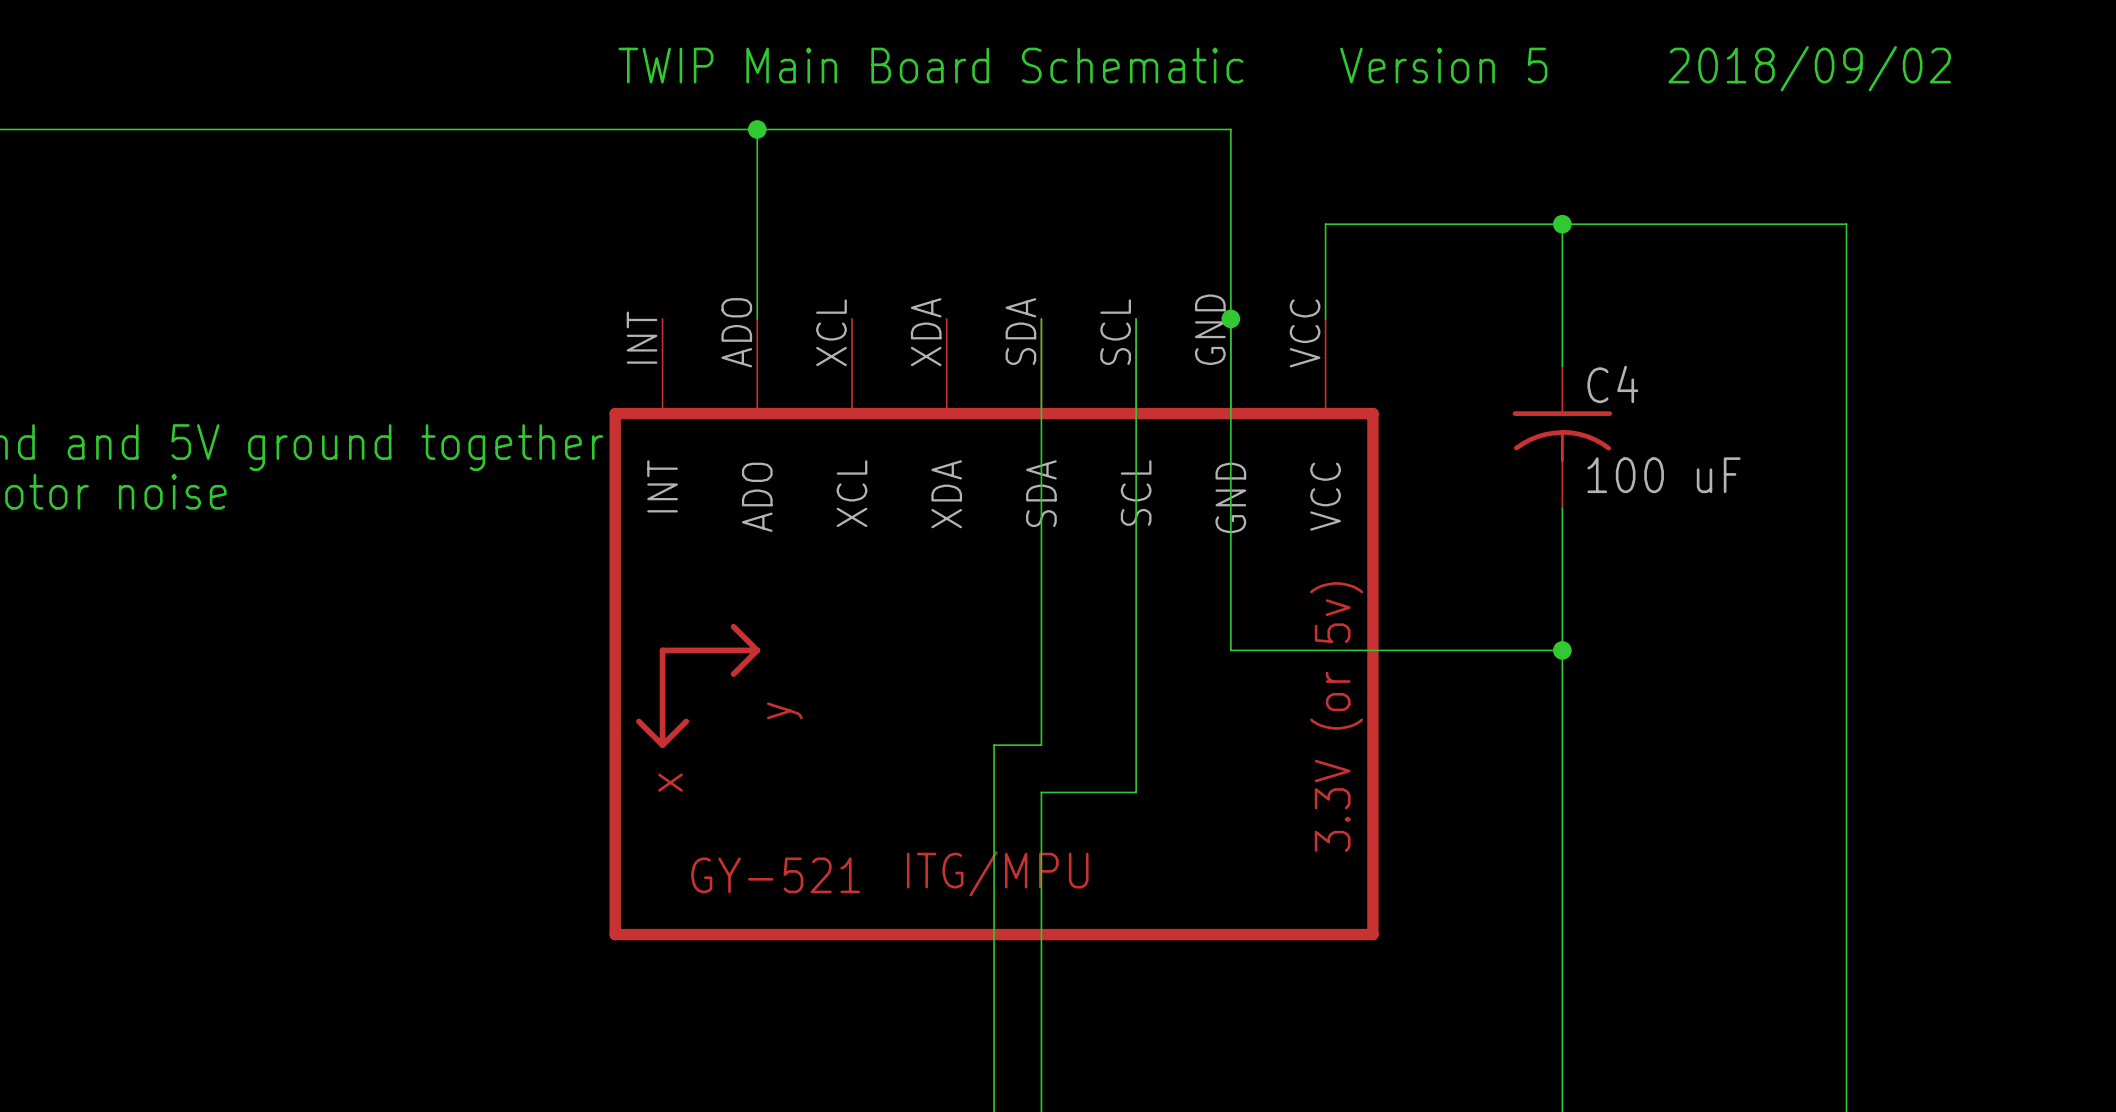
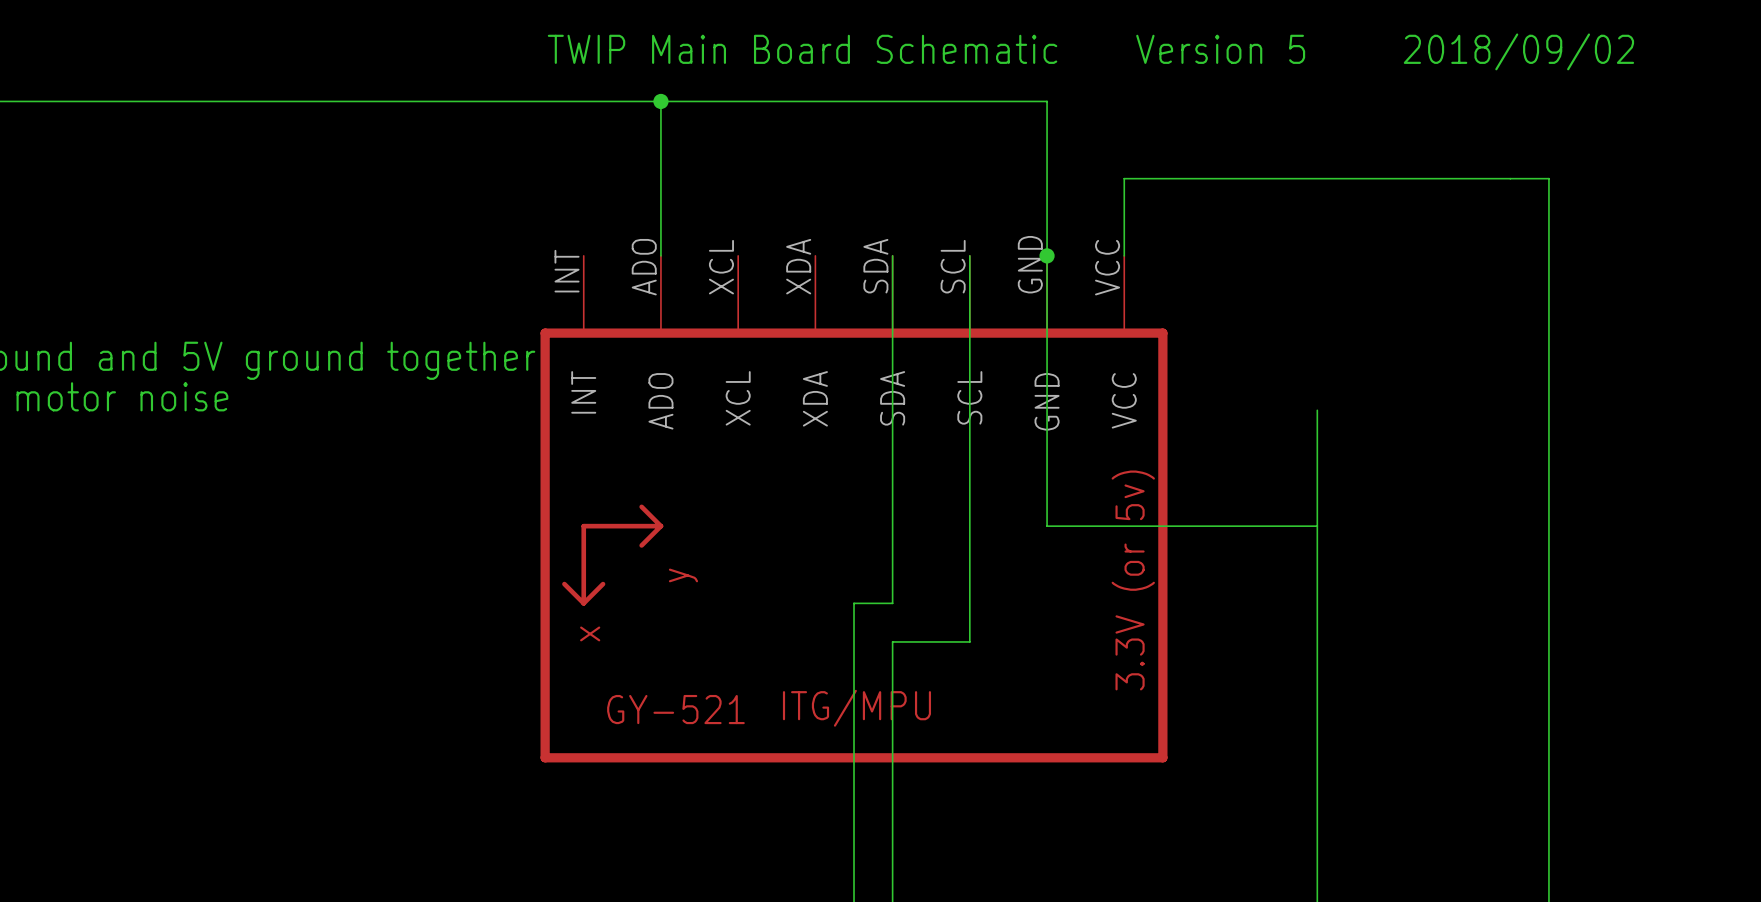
wire: (1562, 224) (1562, 366) -> none
junction: (1562, 224) -> none
C4: 100 uF (1562, 437) -> none
junction: (1562, 650) -> none

